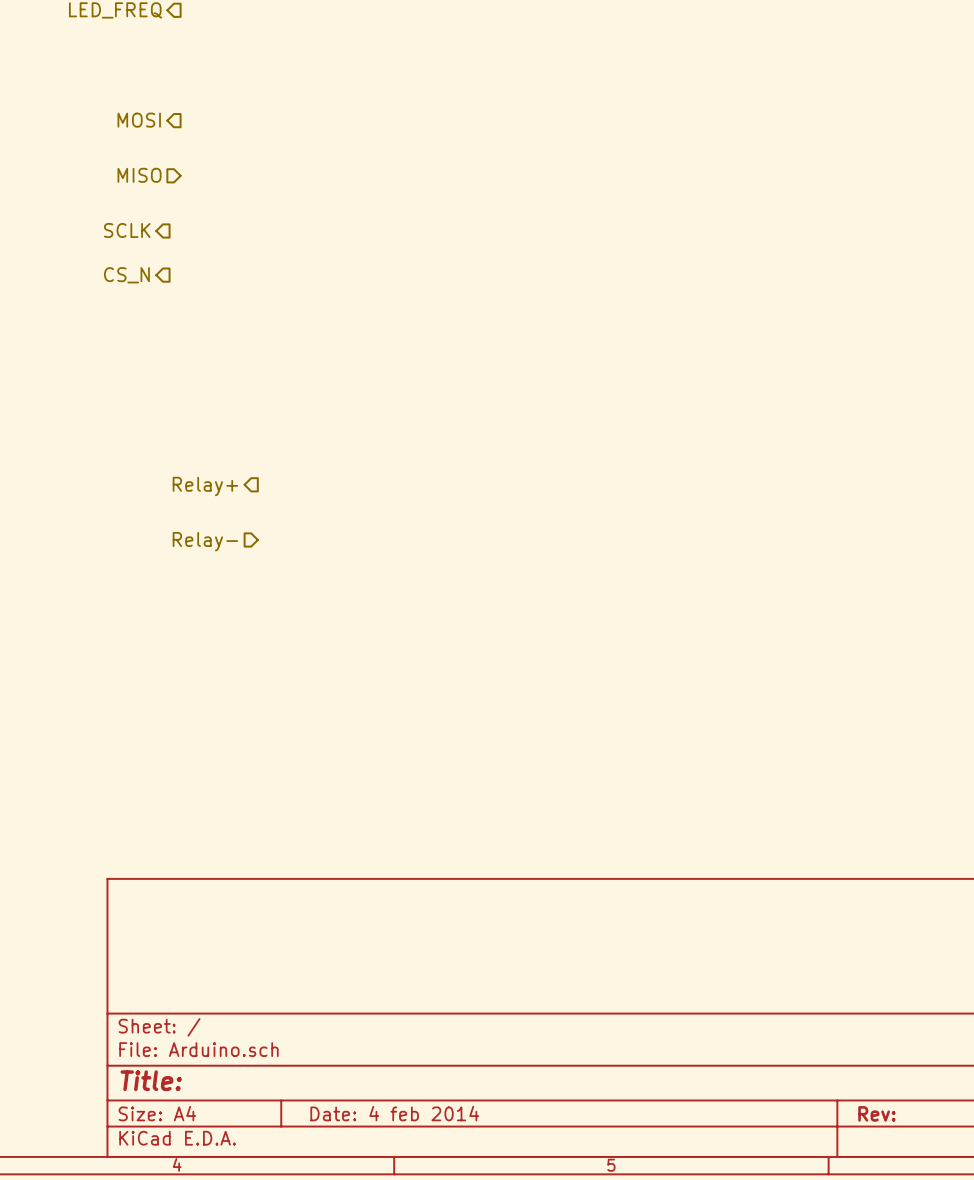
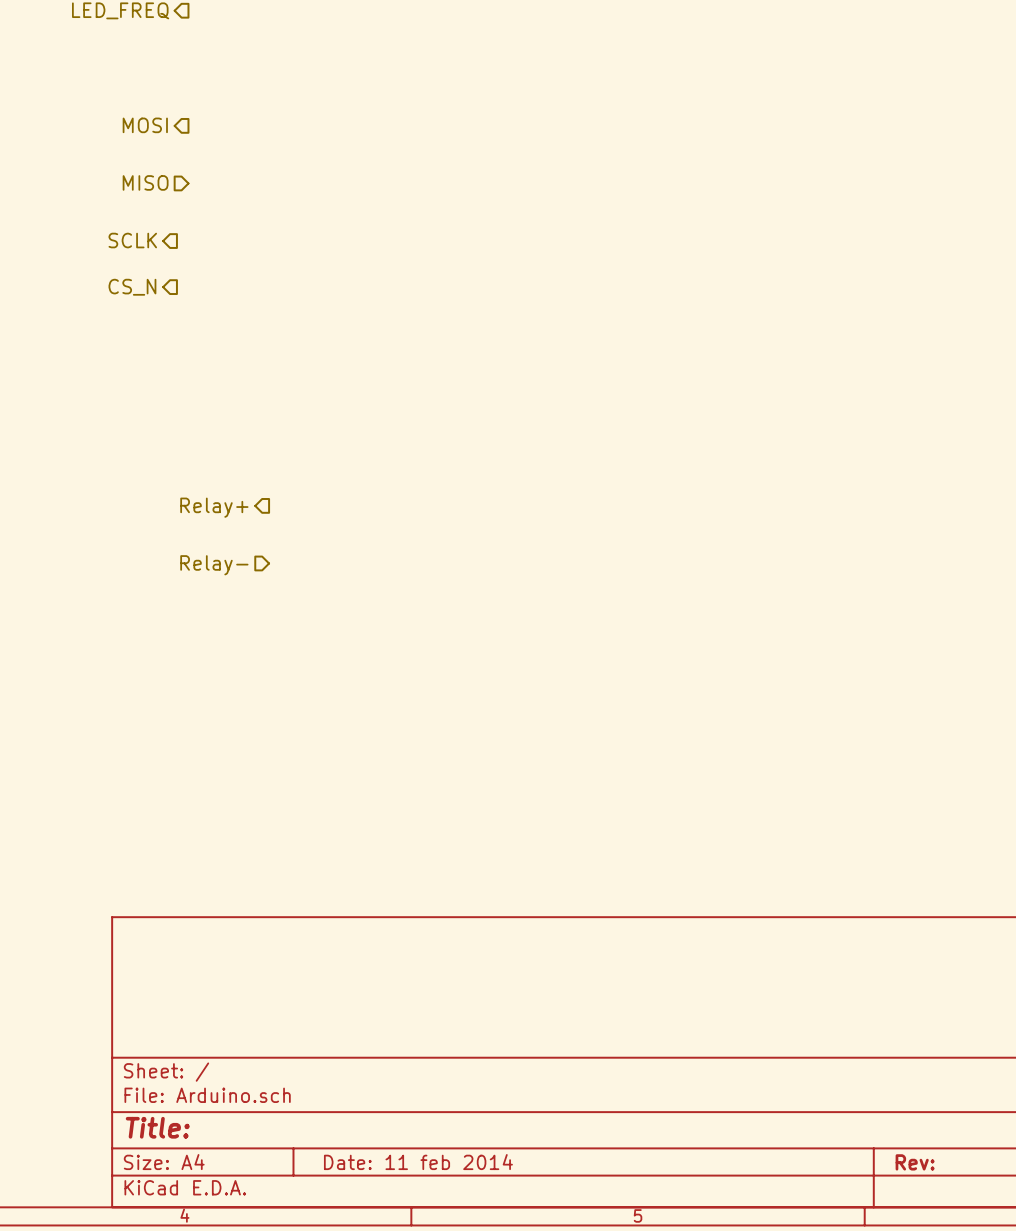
title block: Date: 4 feb 2014 (394, 1113) -> Date: 11 feb 2014 (418, 1162)

